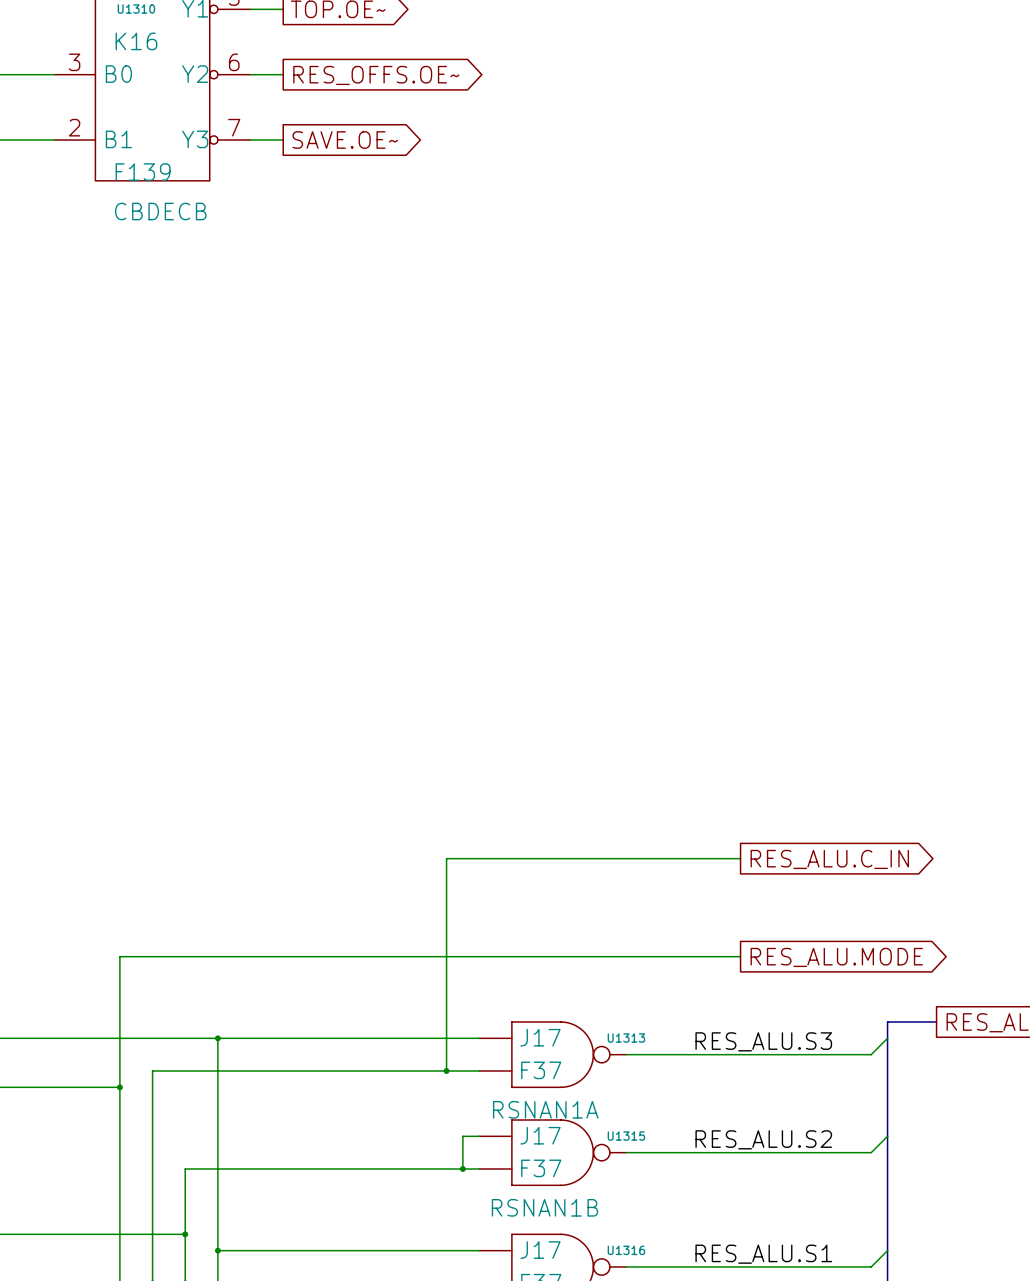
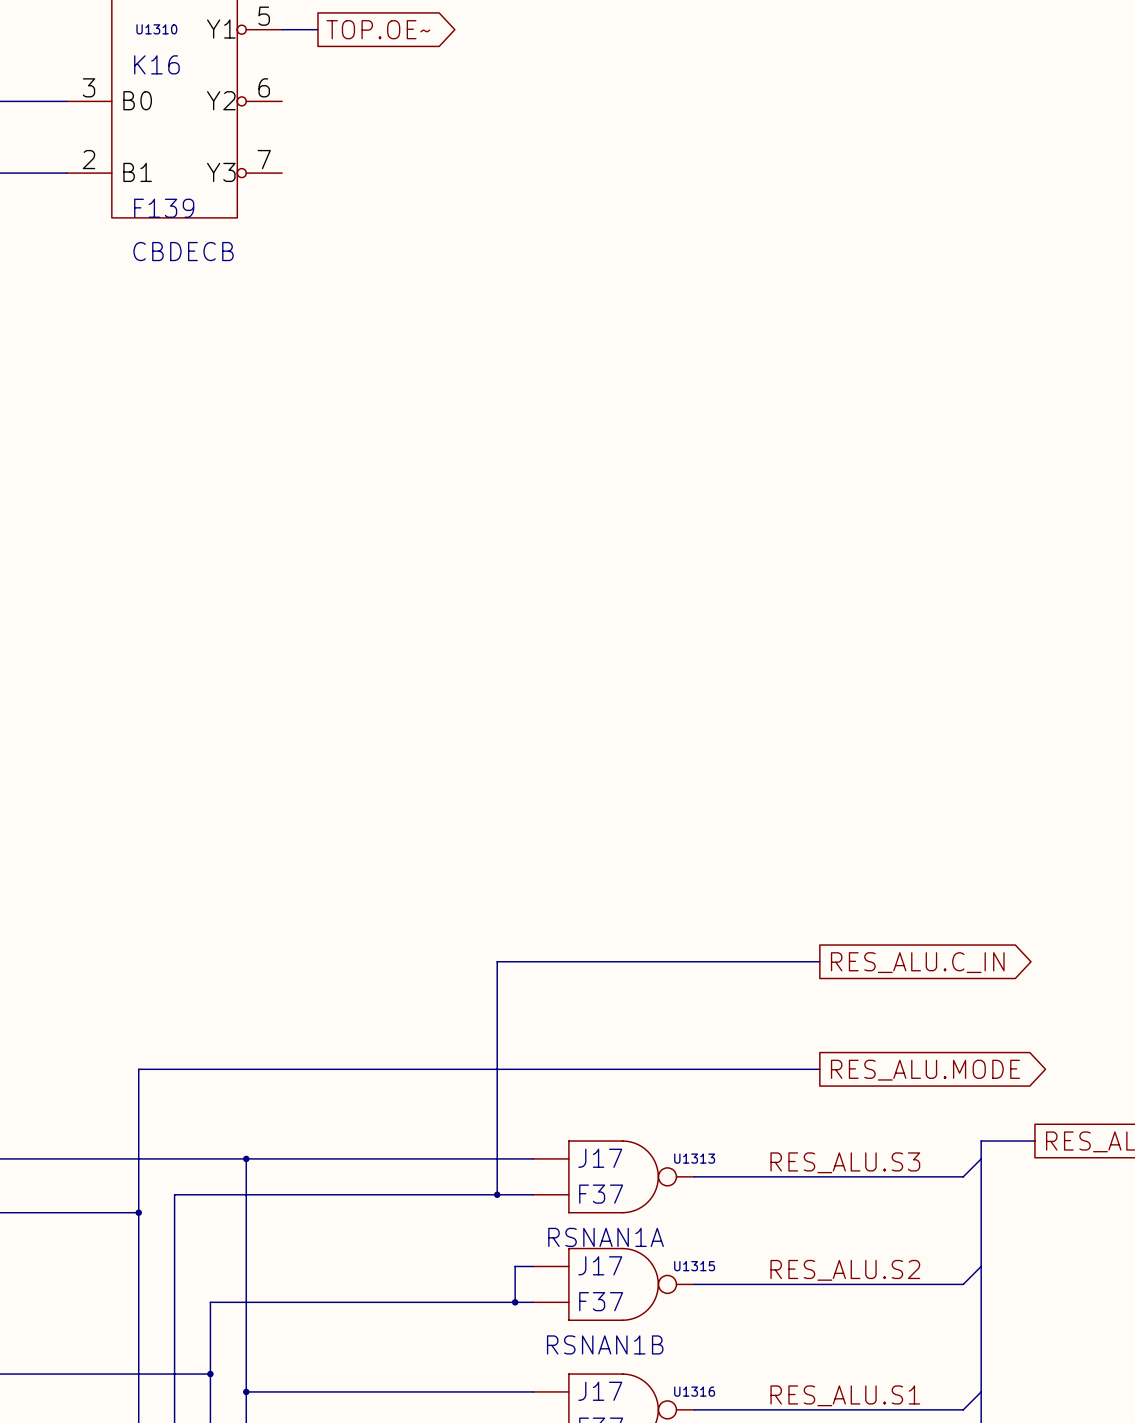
wire: (250, 74) (283, 74) -> none
global label: RES_OFFS.OE~ (376, 75) -> none
wire: (250, 140) (283, 140) -> none
global label: SAVE.OE~ (345, 140) -> none

